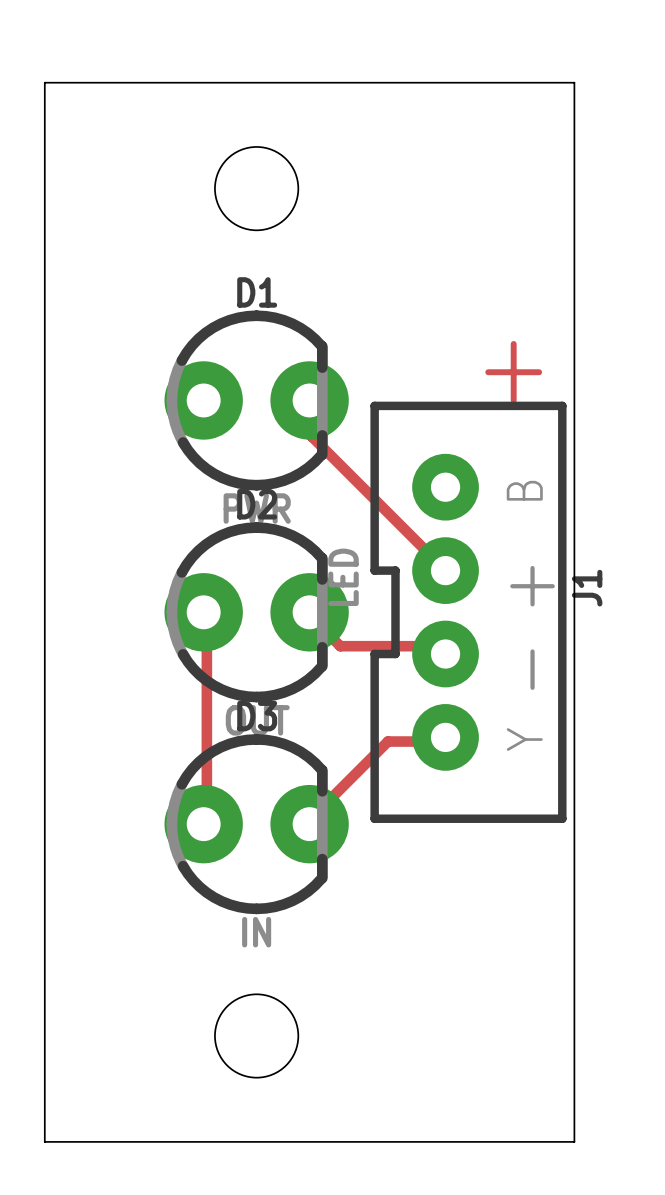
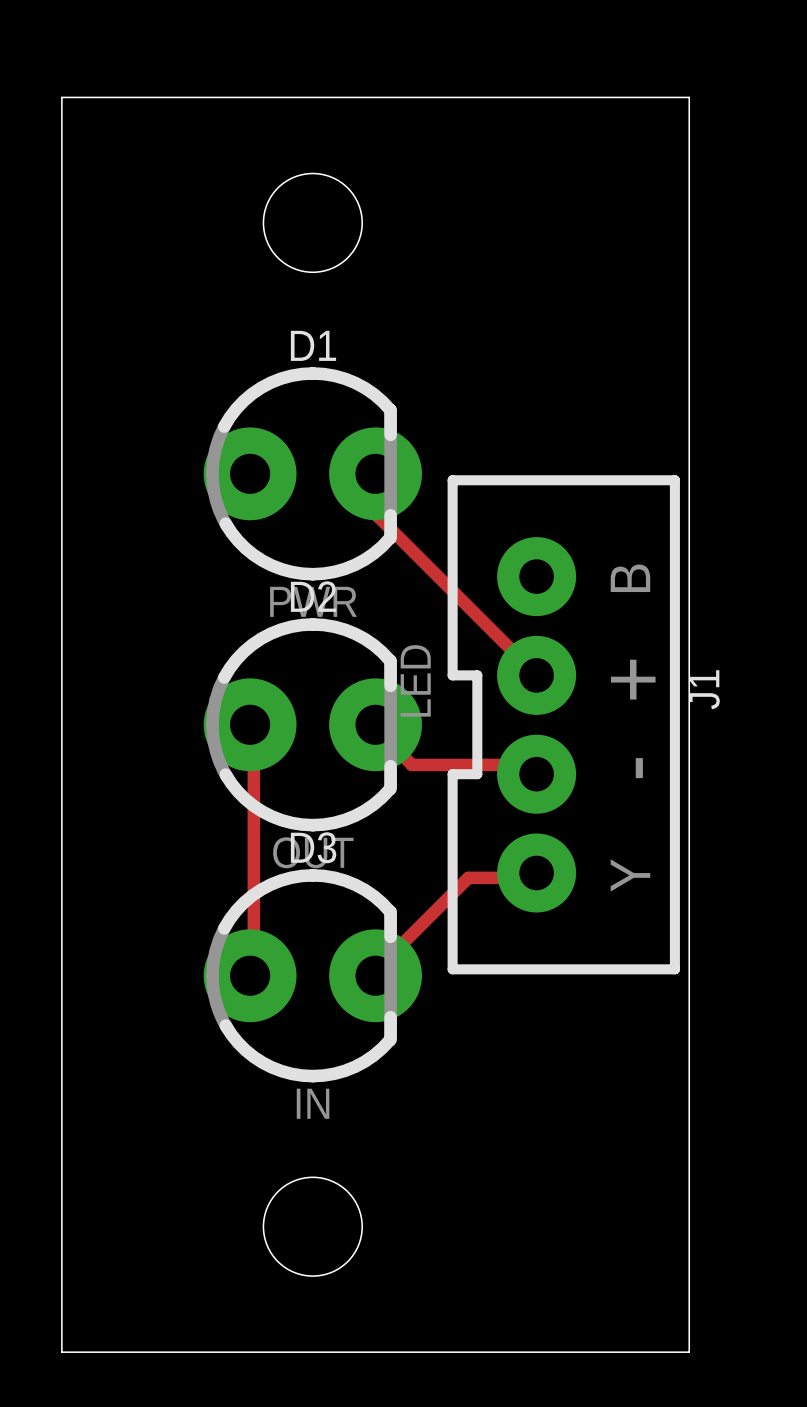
text: + (513, 372) -> none

